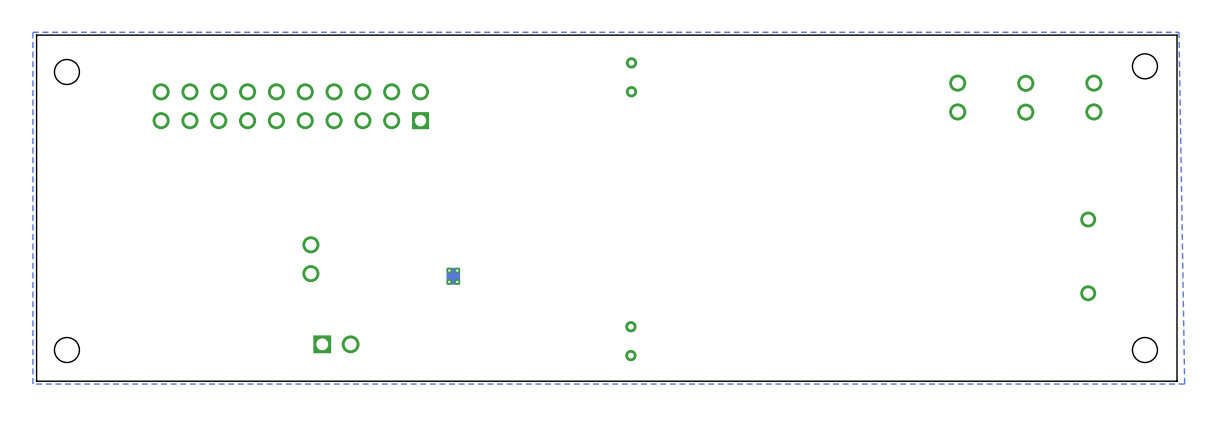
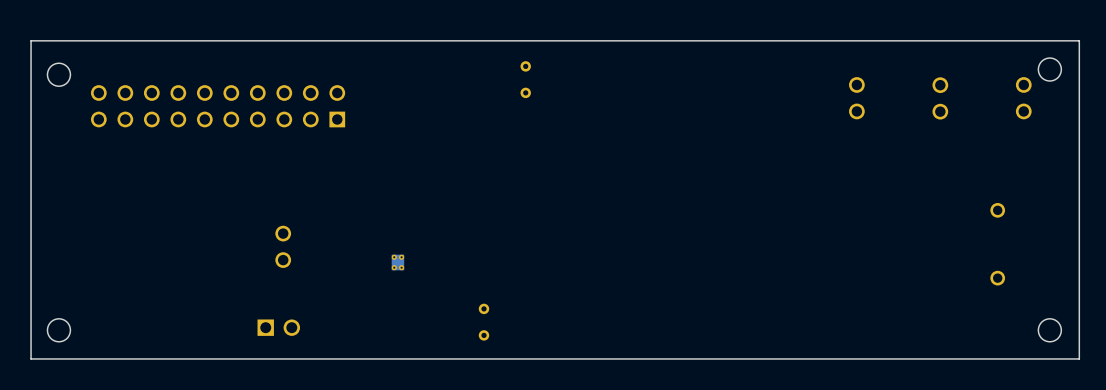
zone outline: (1178, 32) (32, 32) (32, 384) (1184, 384) (1178, 32) -> none
part position: (631, 77) -> (525, 79)
part position: (957, 97) -> (856, 98)
part position: (1093, 97) -> (1023, 98)
part position: (290, 106) -> (218, 106)
part position: (453, 276) -> (397, 262)
part position: (630, 341) -> (483, 322)
part position: (336, 344) -> (278, 327)

